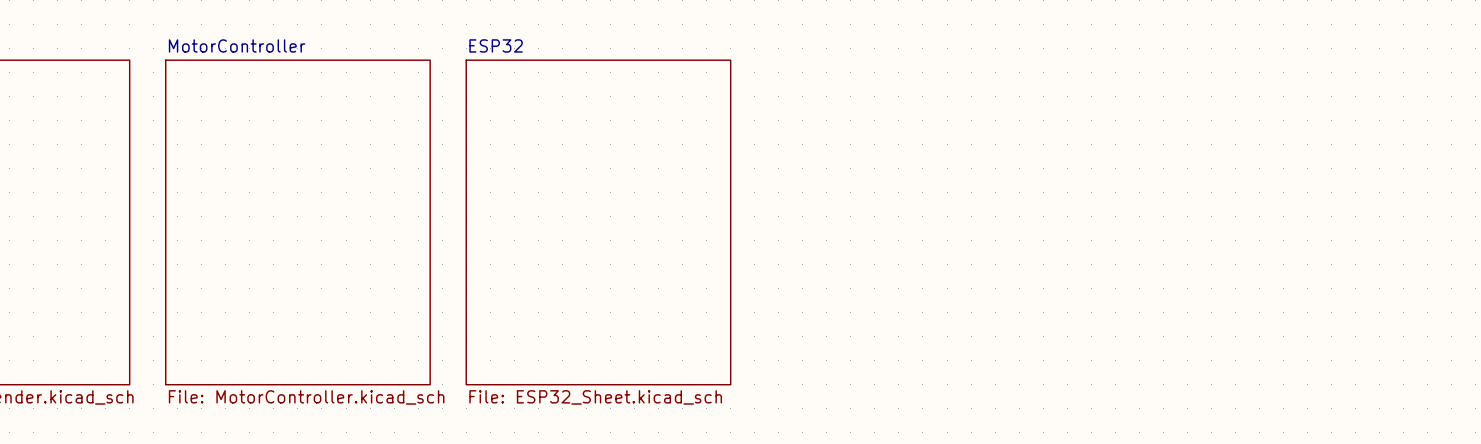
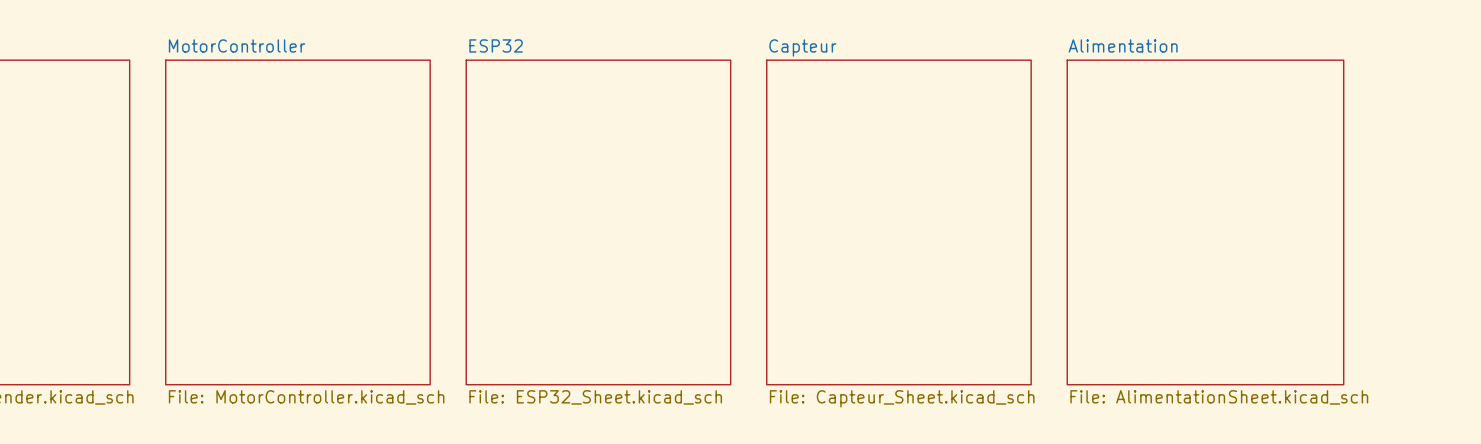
sheet Capteur: none -> File: Capteur_Sheet.kicad_sch (898, 222)
sheet Alimentation: none -> File: AlimentationSheet.kicad_sch (1205, 222)

